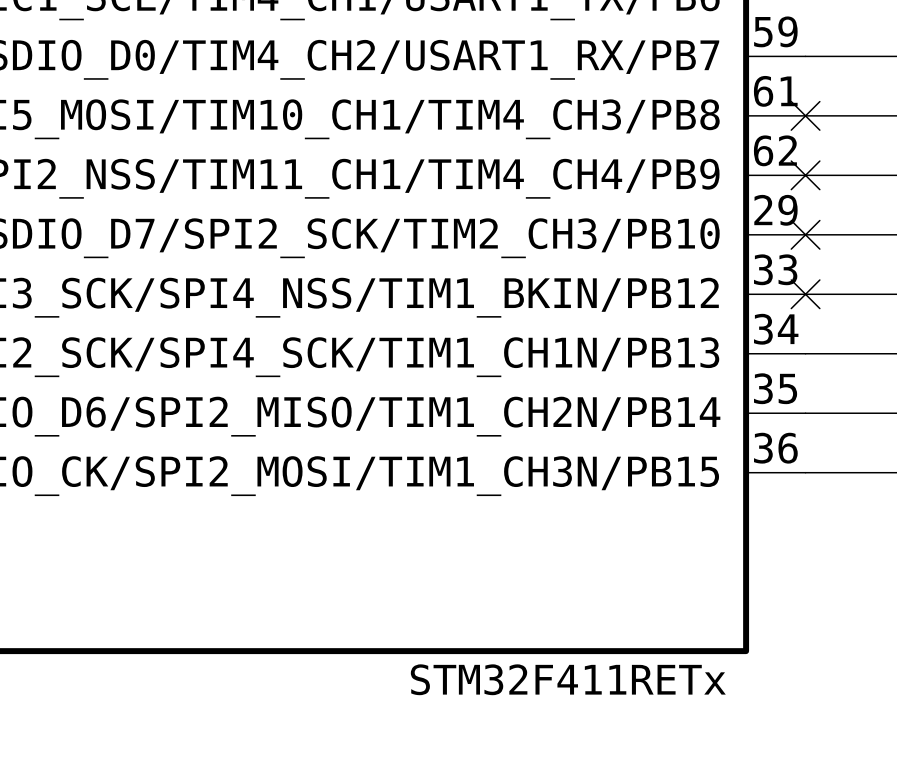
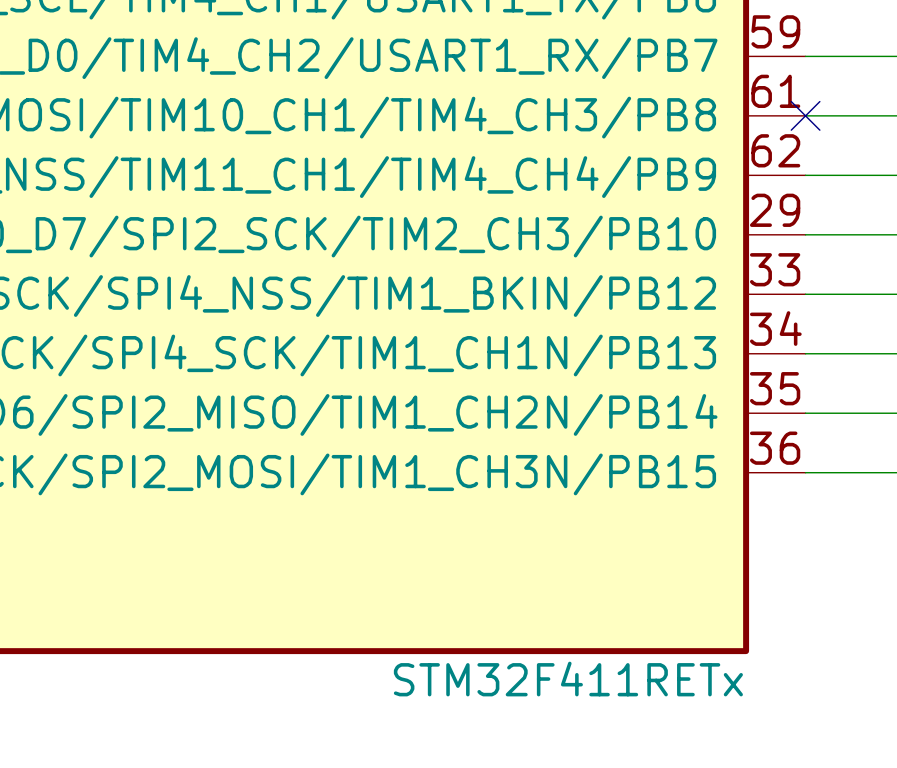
no-connect mark: (805, 175) -> none
no-connect mark: (805, 234) -> none
no-connect mark: (805, 294) -> none

